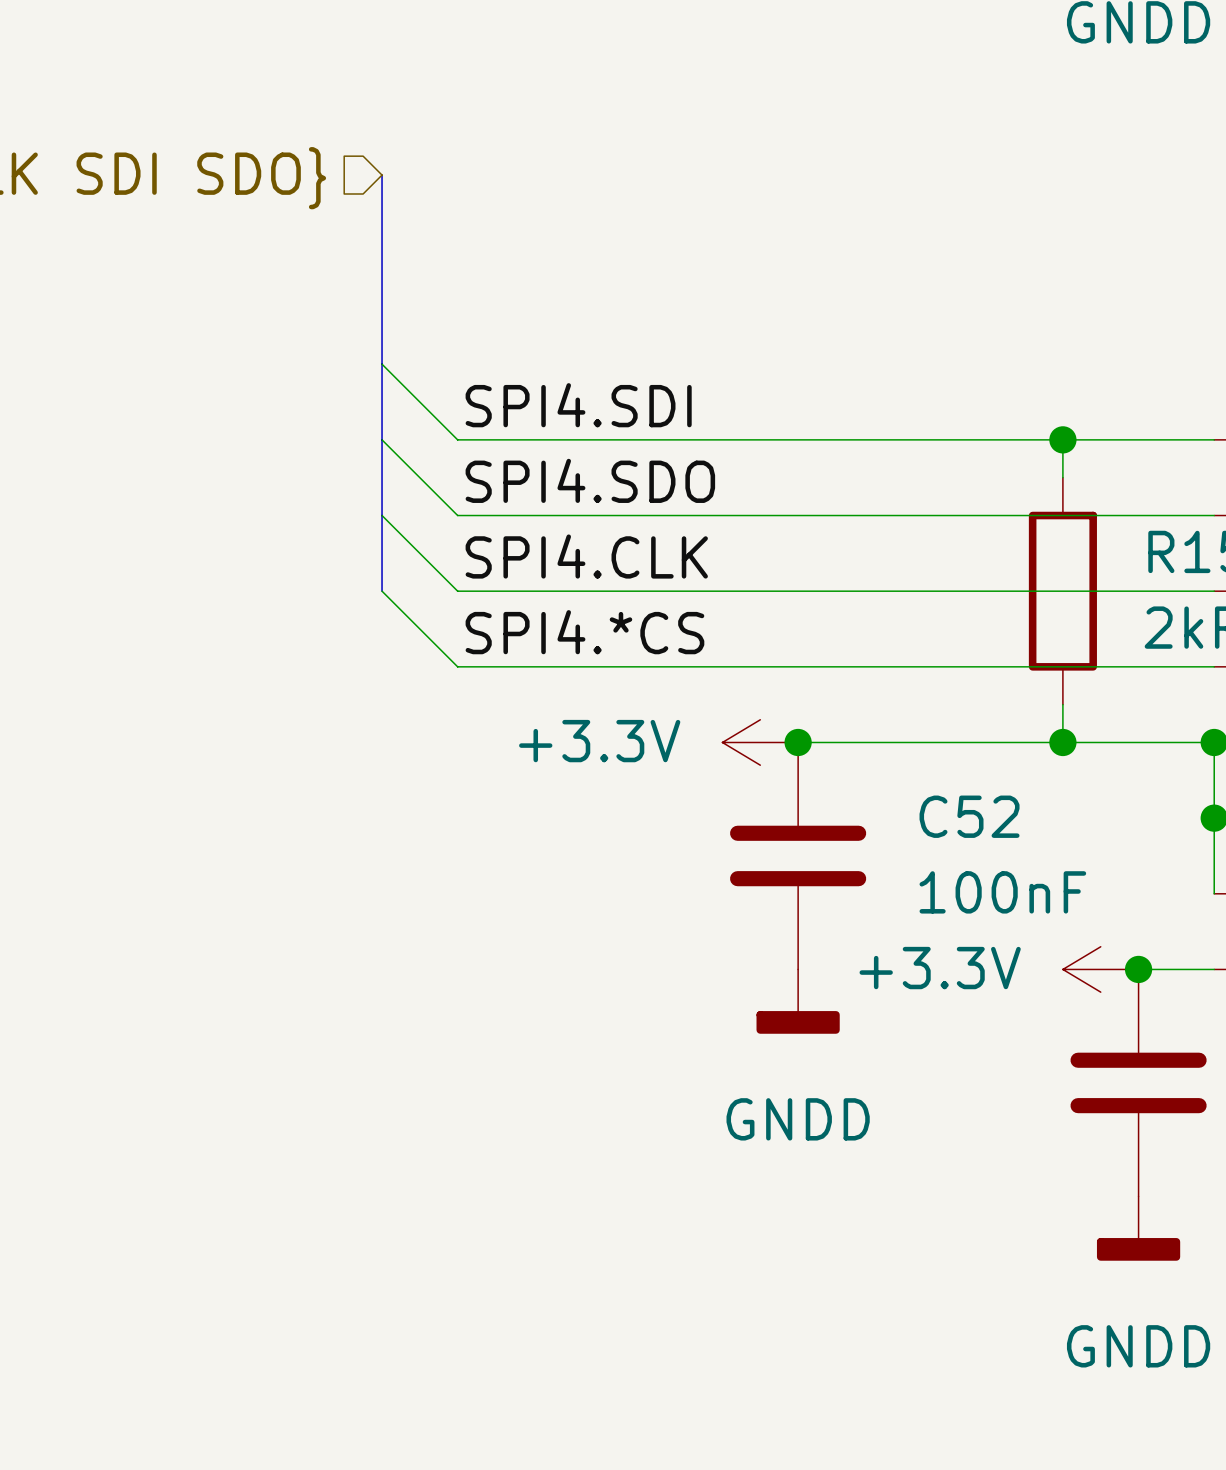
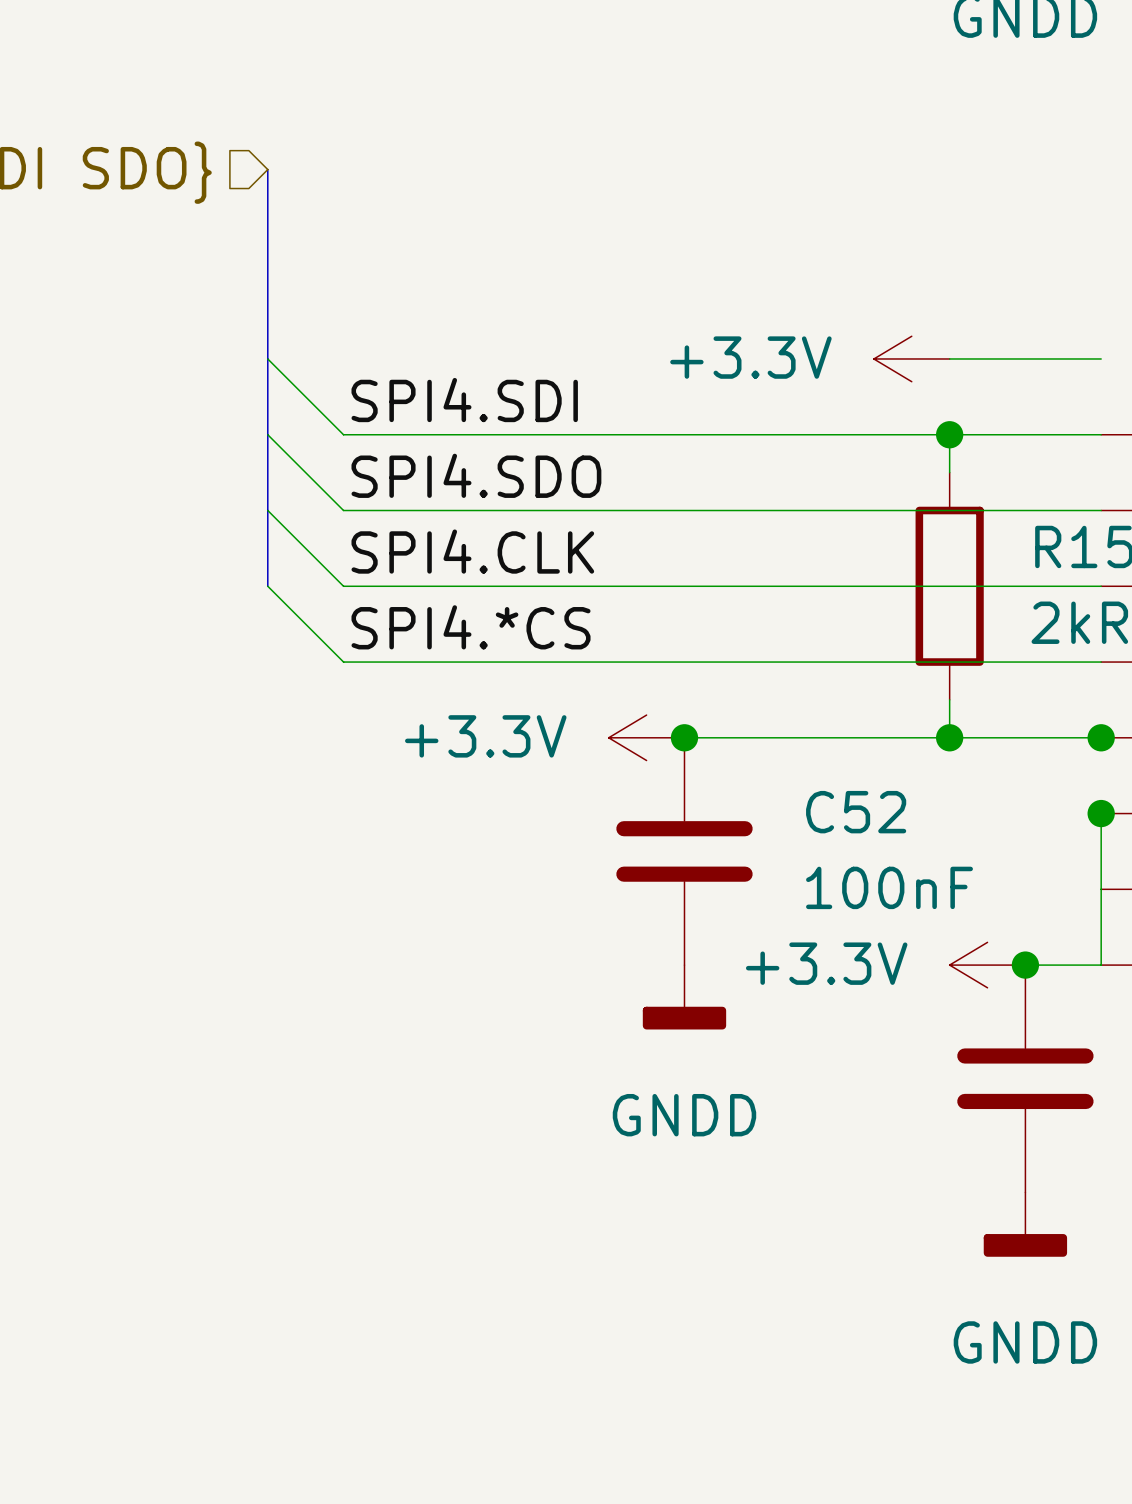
power symbol: none -> +3.3V (911, 358)
wire: none -> (949, 358) (1101, 358)
wire: (1214, 742) (1214, 818) -> (1101, 889) (1101, 965)

